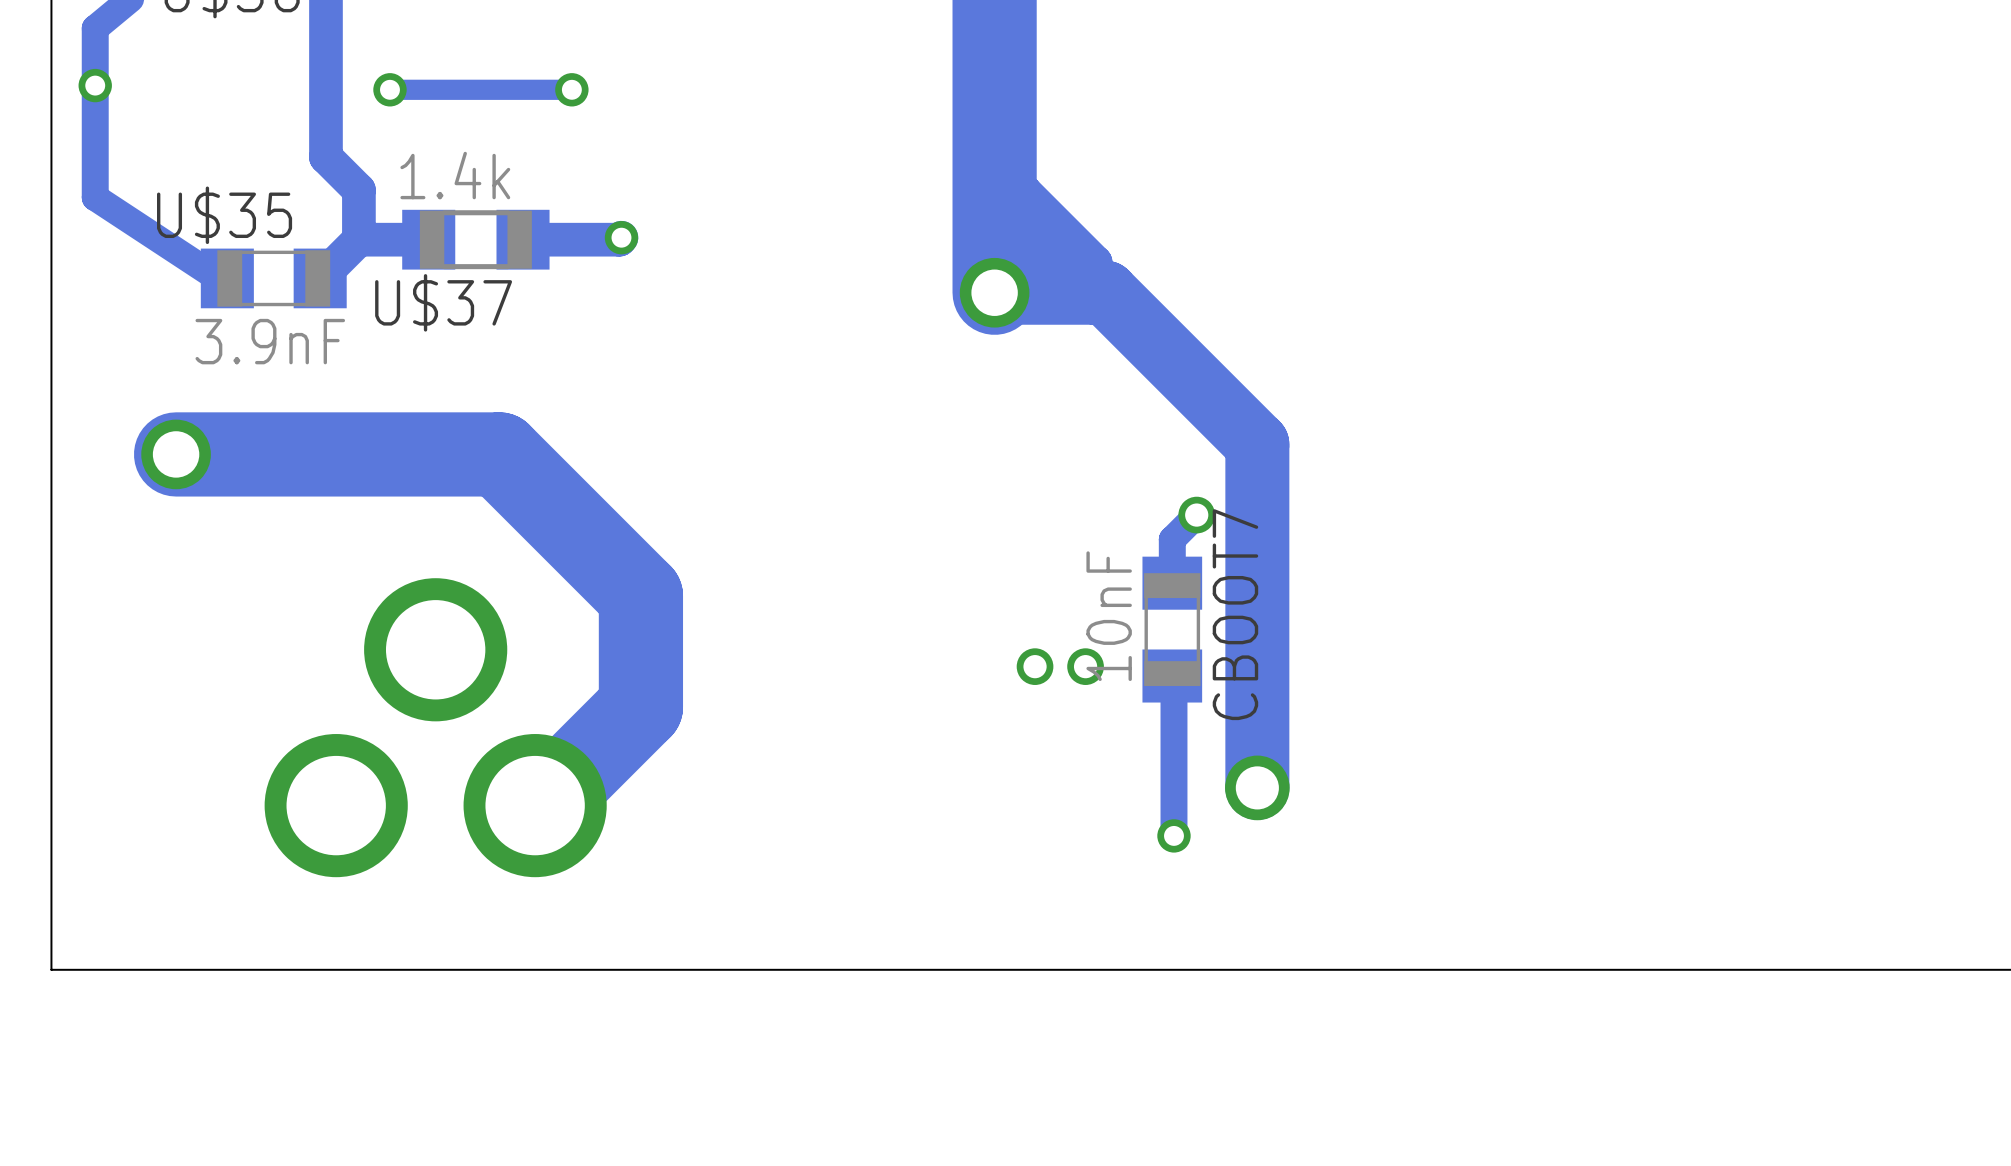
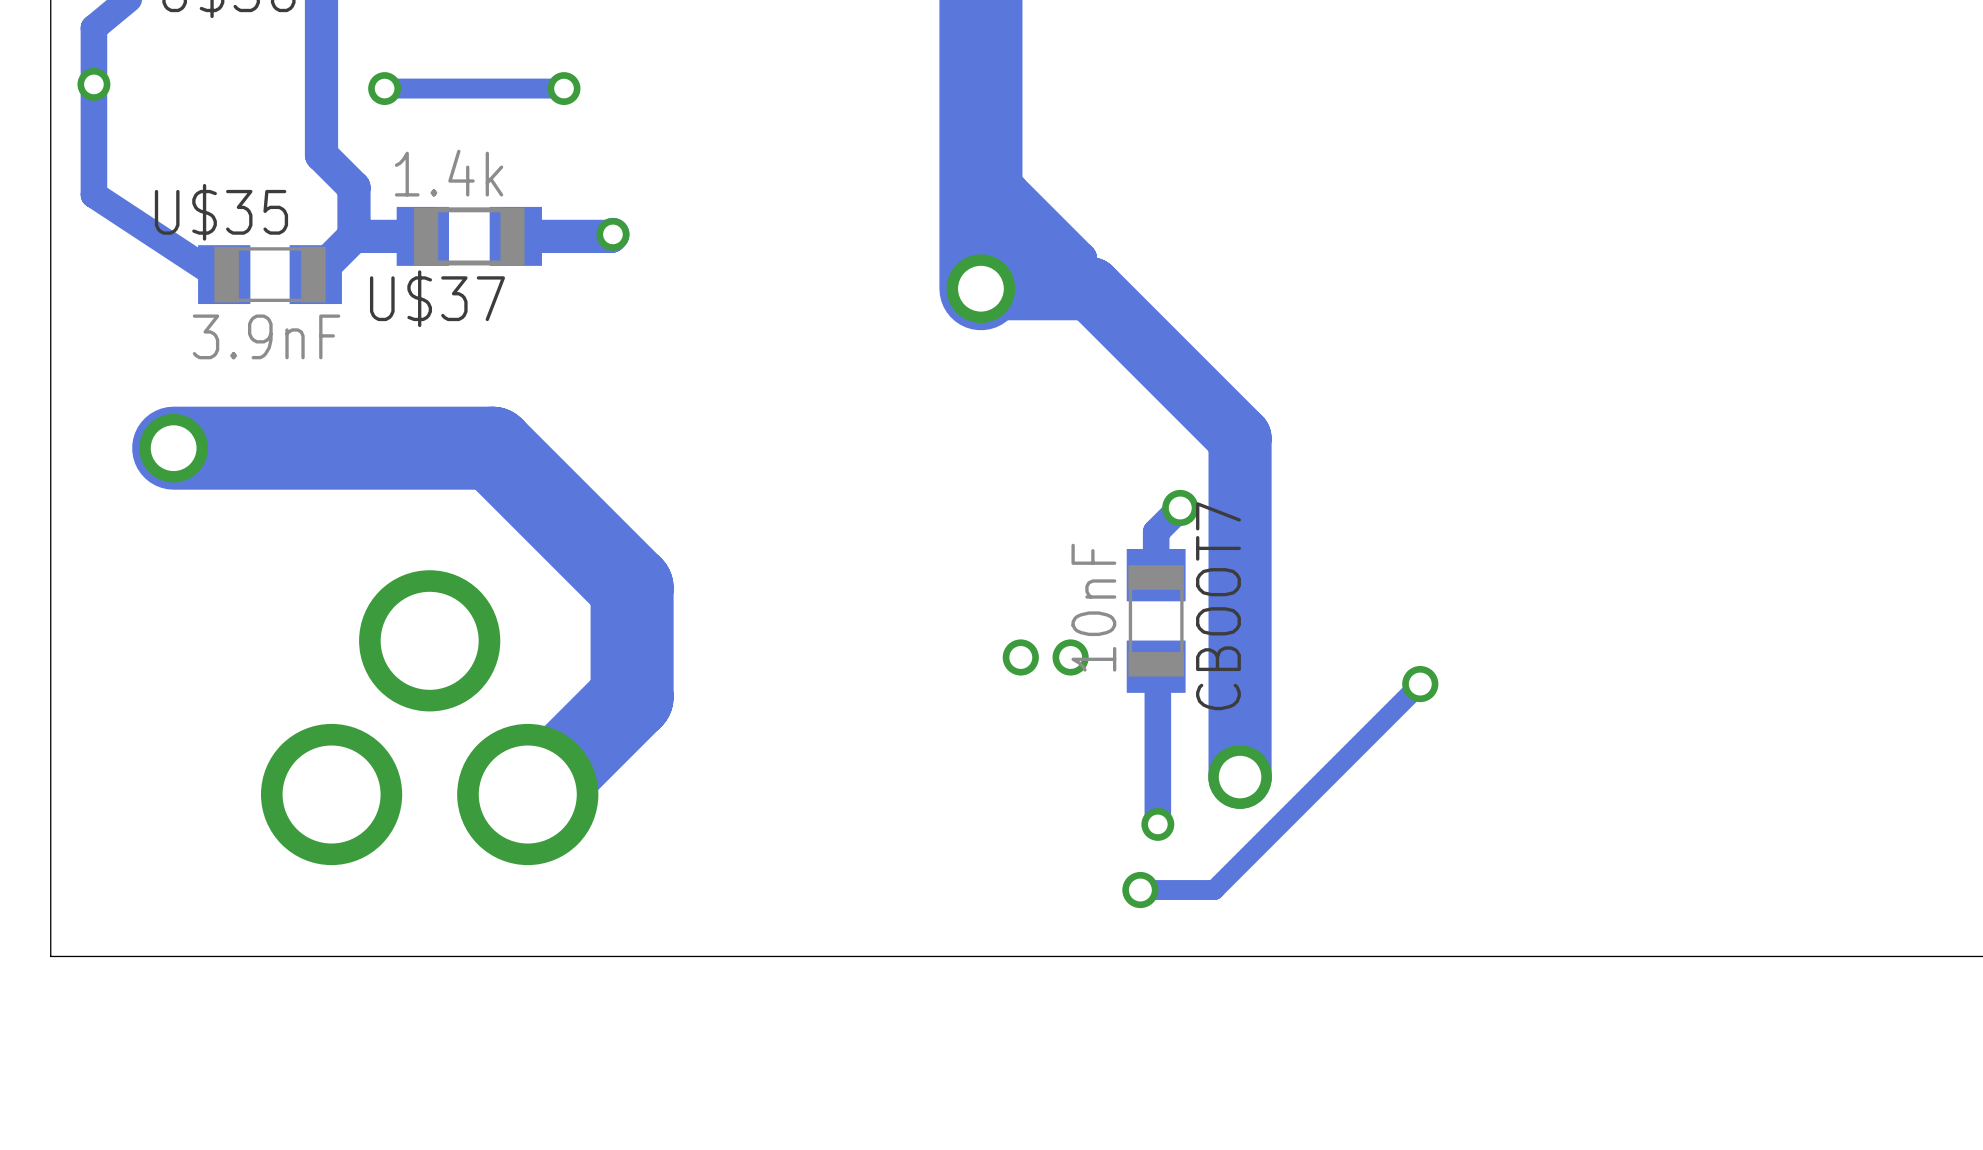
track: none -> (1420, 684) (1214, 890) (1140, 890)
via: none -> (1420, 684)
via: none -> (1140, 890)

